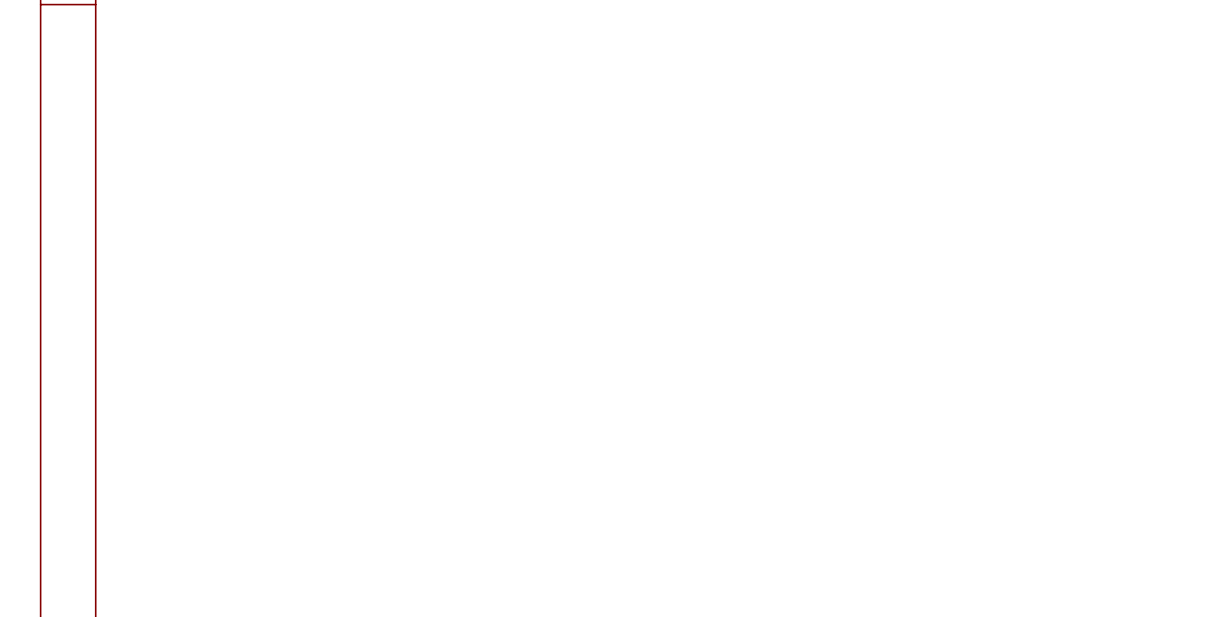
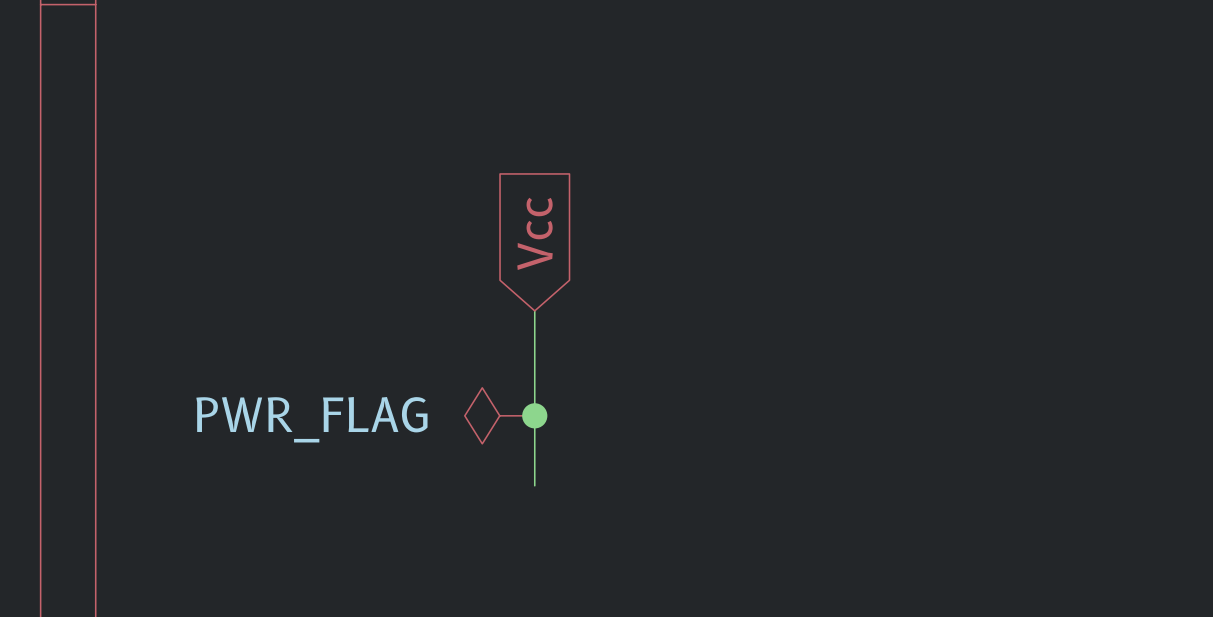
global label: none -> Vcc (534, 233)
wire: none -> (534, 310) (534, 485)
power symbol: none -> PWR_FLAG (499, 415)
junction: none -> (534, 415)

